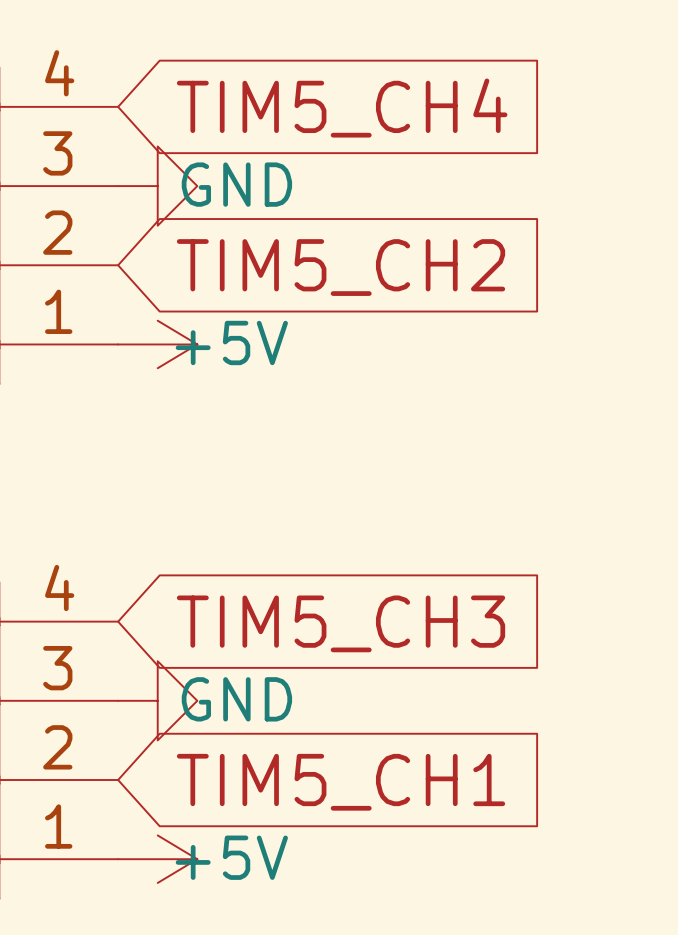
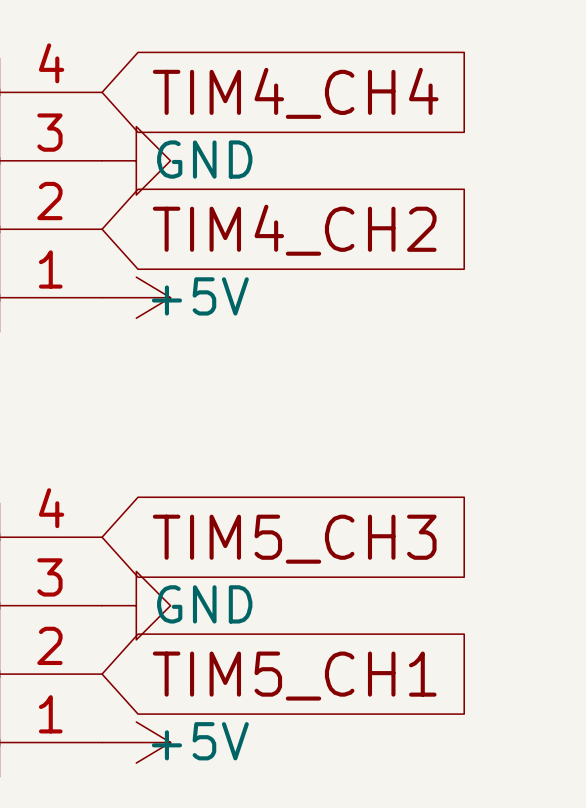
global label: TIM5_CH4 (342, 108) -> TIM4_CH4 (295, 93)
global label: TIM5_CH2 (341, 267) -> TIM4_CH2 (294, 230)

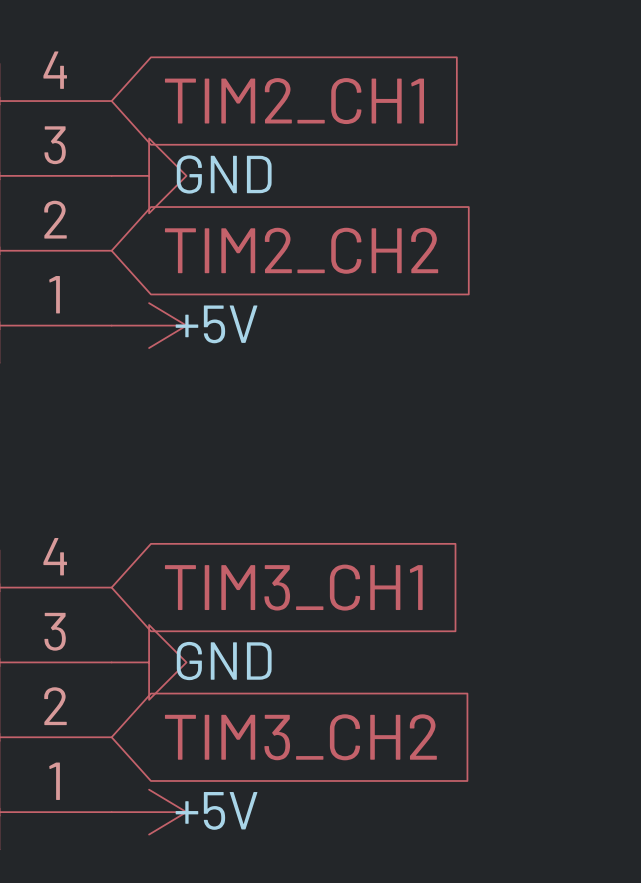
global label: TIM4_CH4 (295, 93) -> TIM2_CH1 (294, 101)
global label: TIM4_CH2 (294, 230) -> TIM2_CH2 (301, 250)
global label: TIM5_CH3 (294, 539) -> TIM3_CH1 (293, 587)
global label: TIM5_CH1 (294, 676) -> TIM3_CH2 (300, 737)

